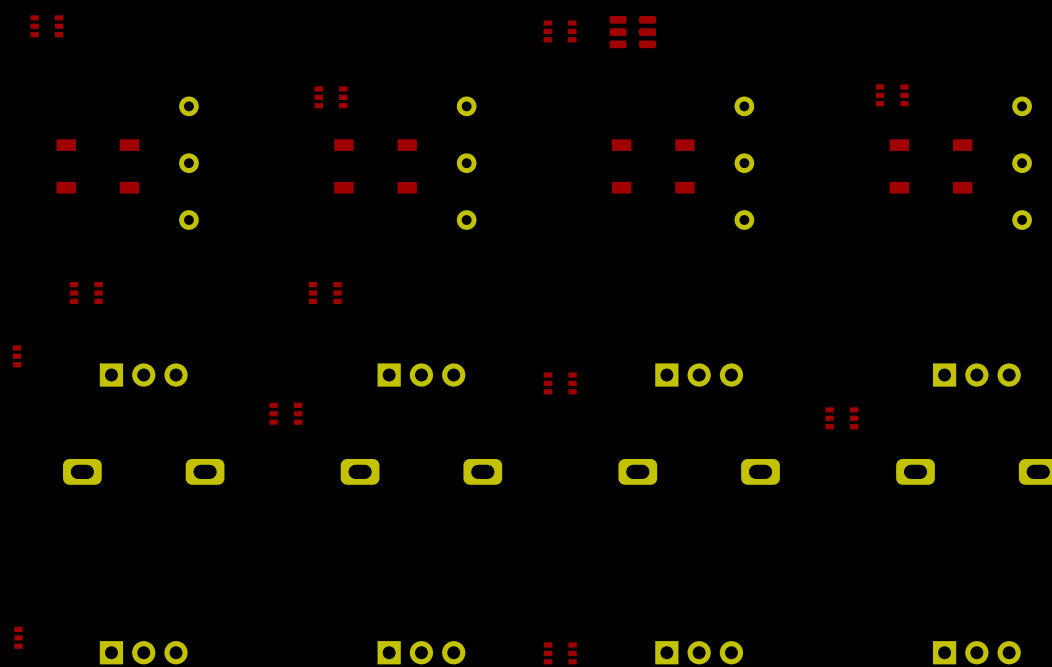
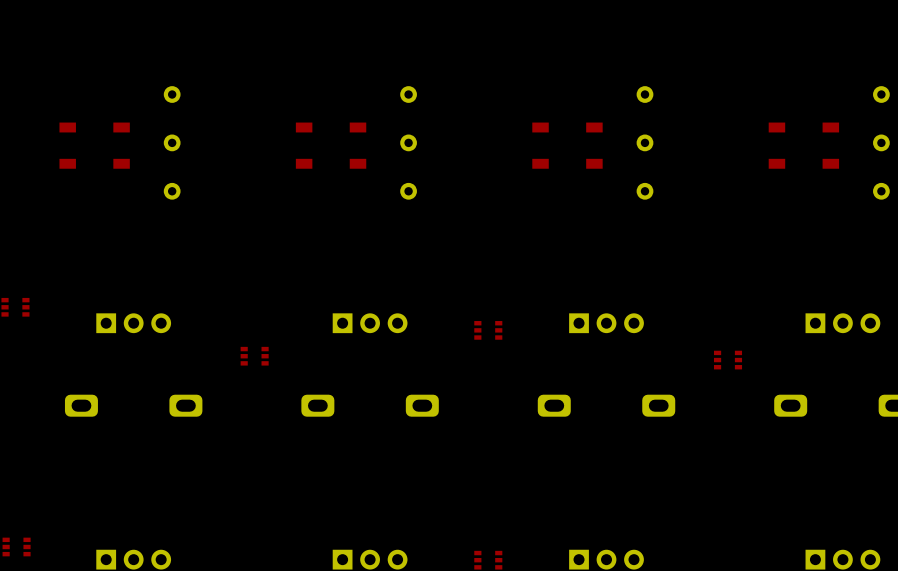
part: (46, 26) -> none
part: (559, 31) -> none
part: (632, 32) -> none
part: (892, 95) -> none
part: (331, 97) -> none
part: (86, 292) -> none
part: (325, 292) -> none

